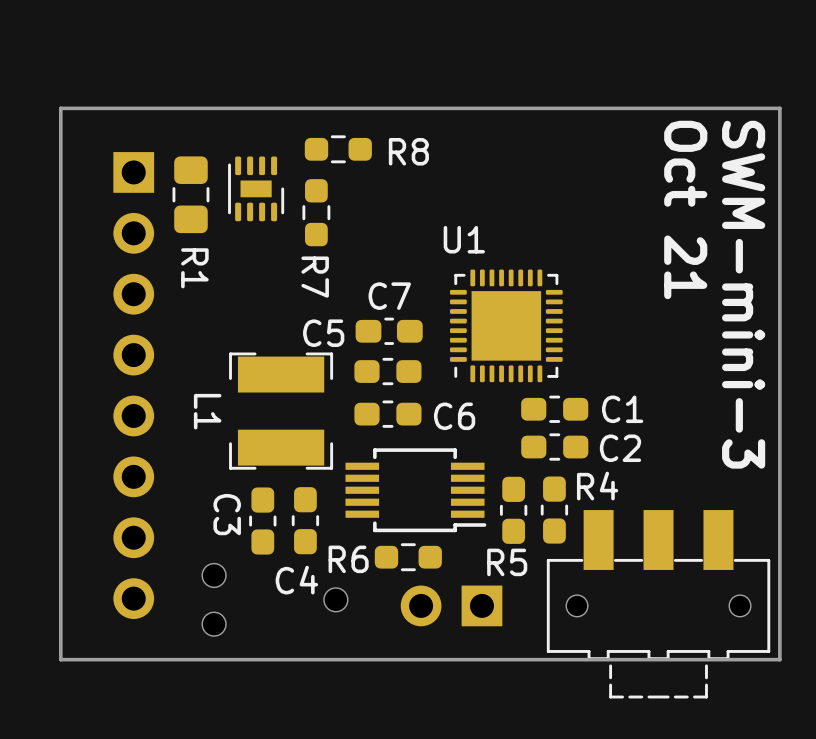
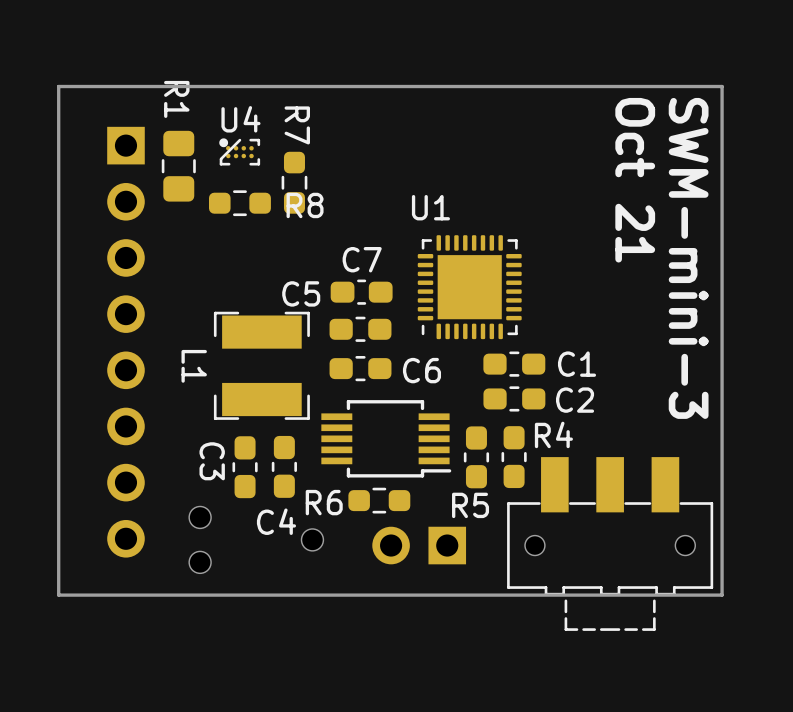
R8 position: (338, 149) -> (239, 203)
U4: none -> (239, 151)
part: (256, 188) -> none
R1 name position: R1 (194, 268) -> R1 (176, 99)
R7 name position: R7 (315, 277) -> R7 (297, 125)

